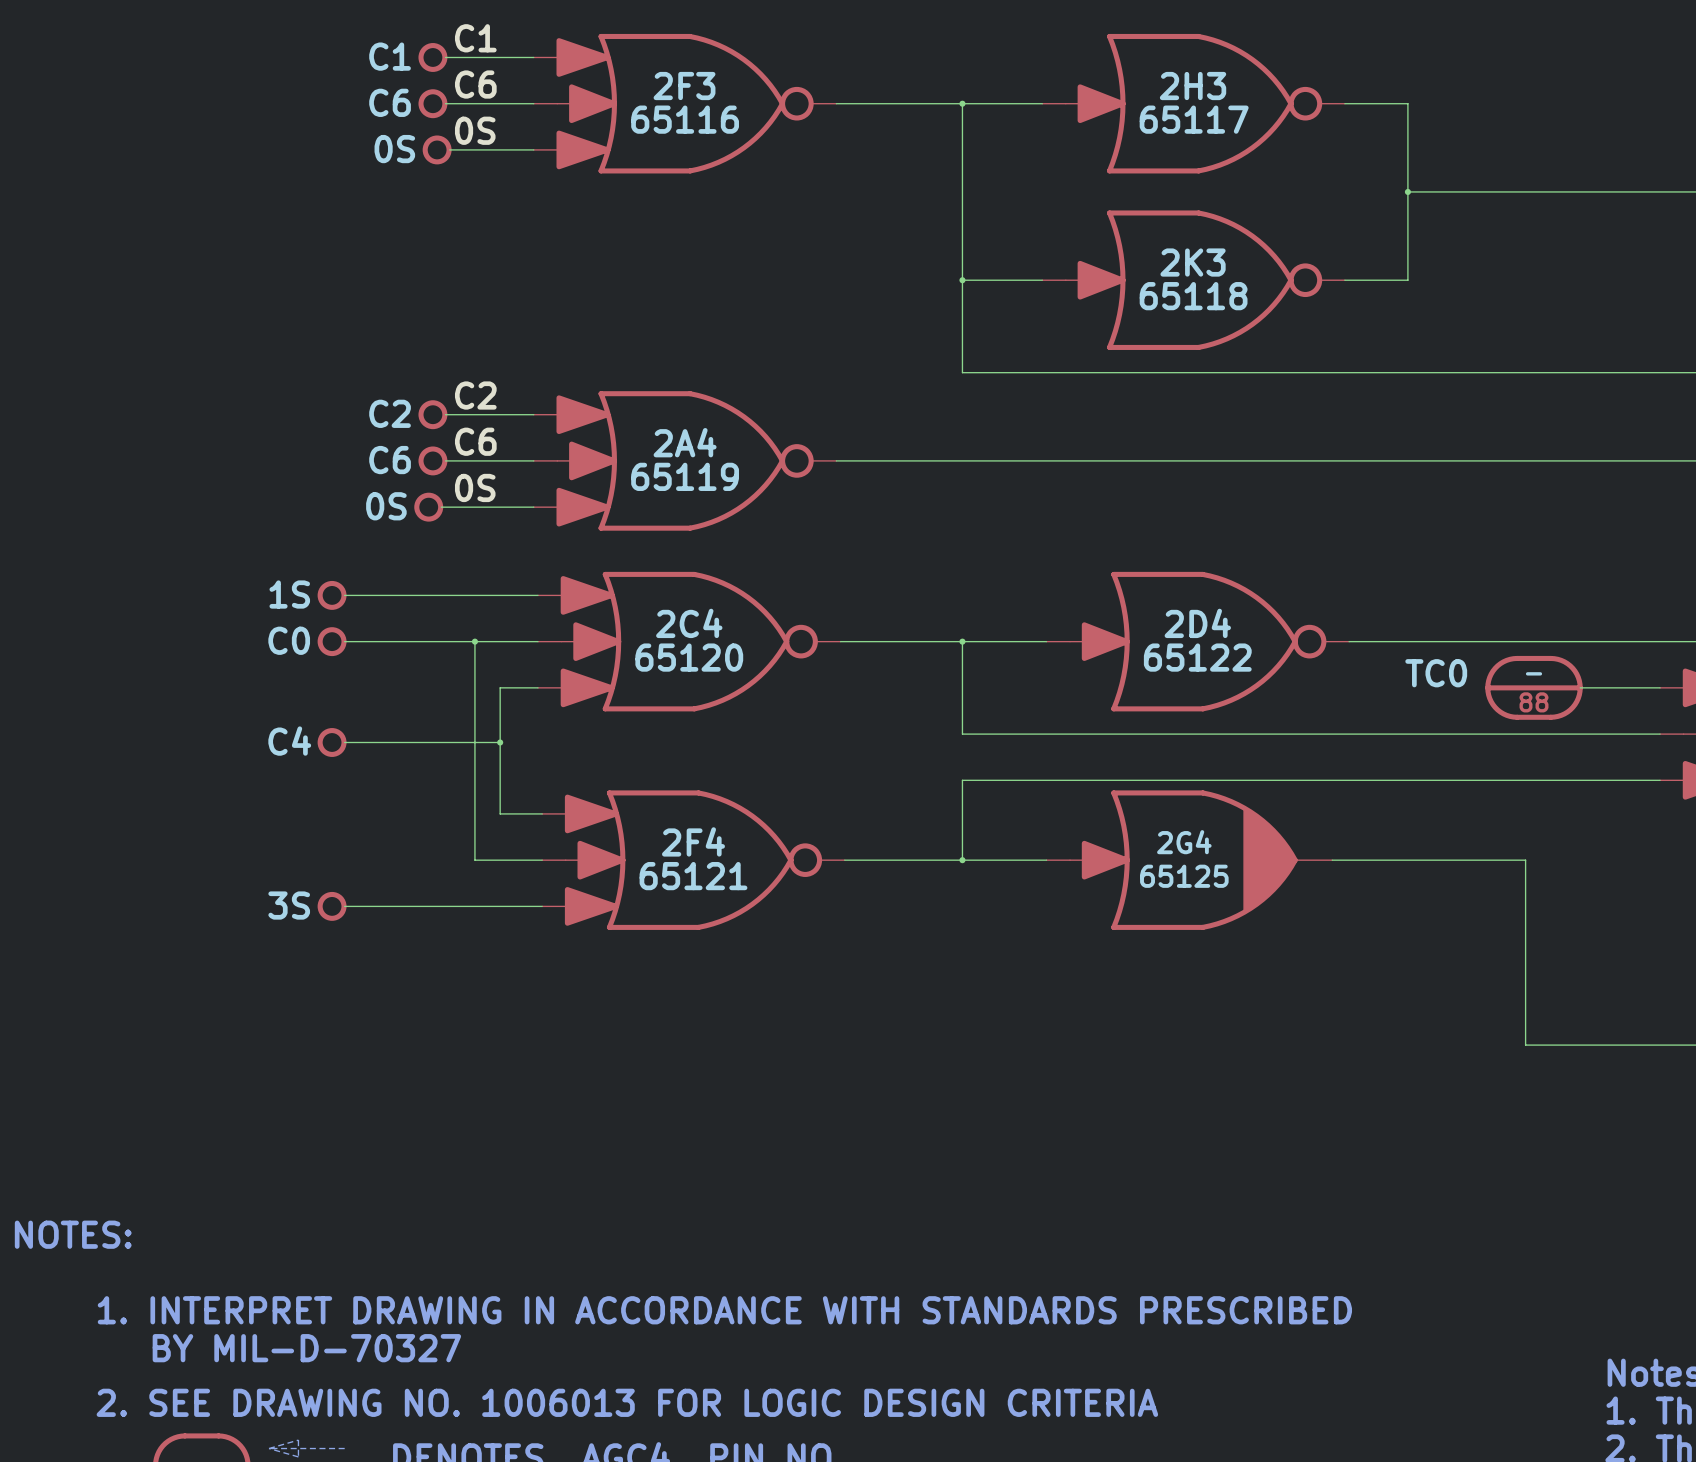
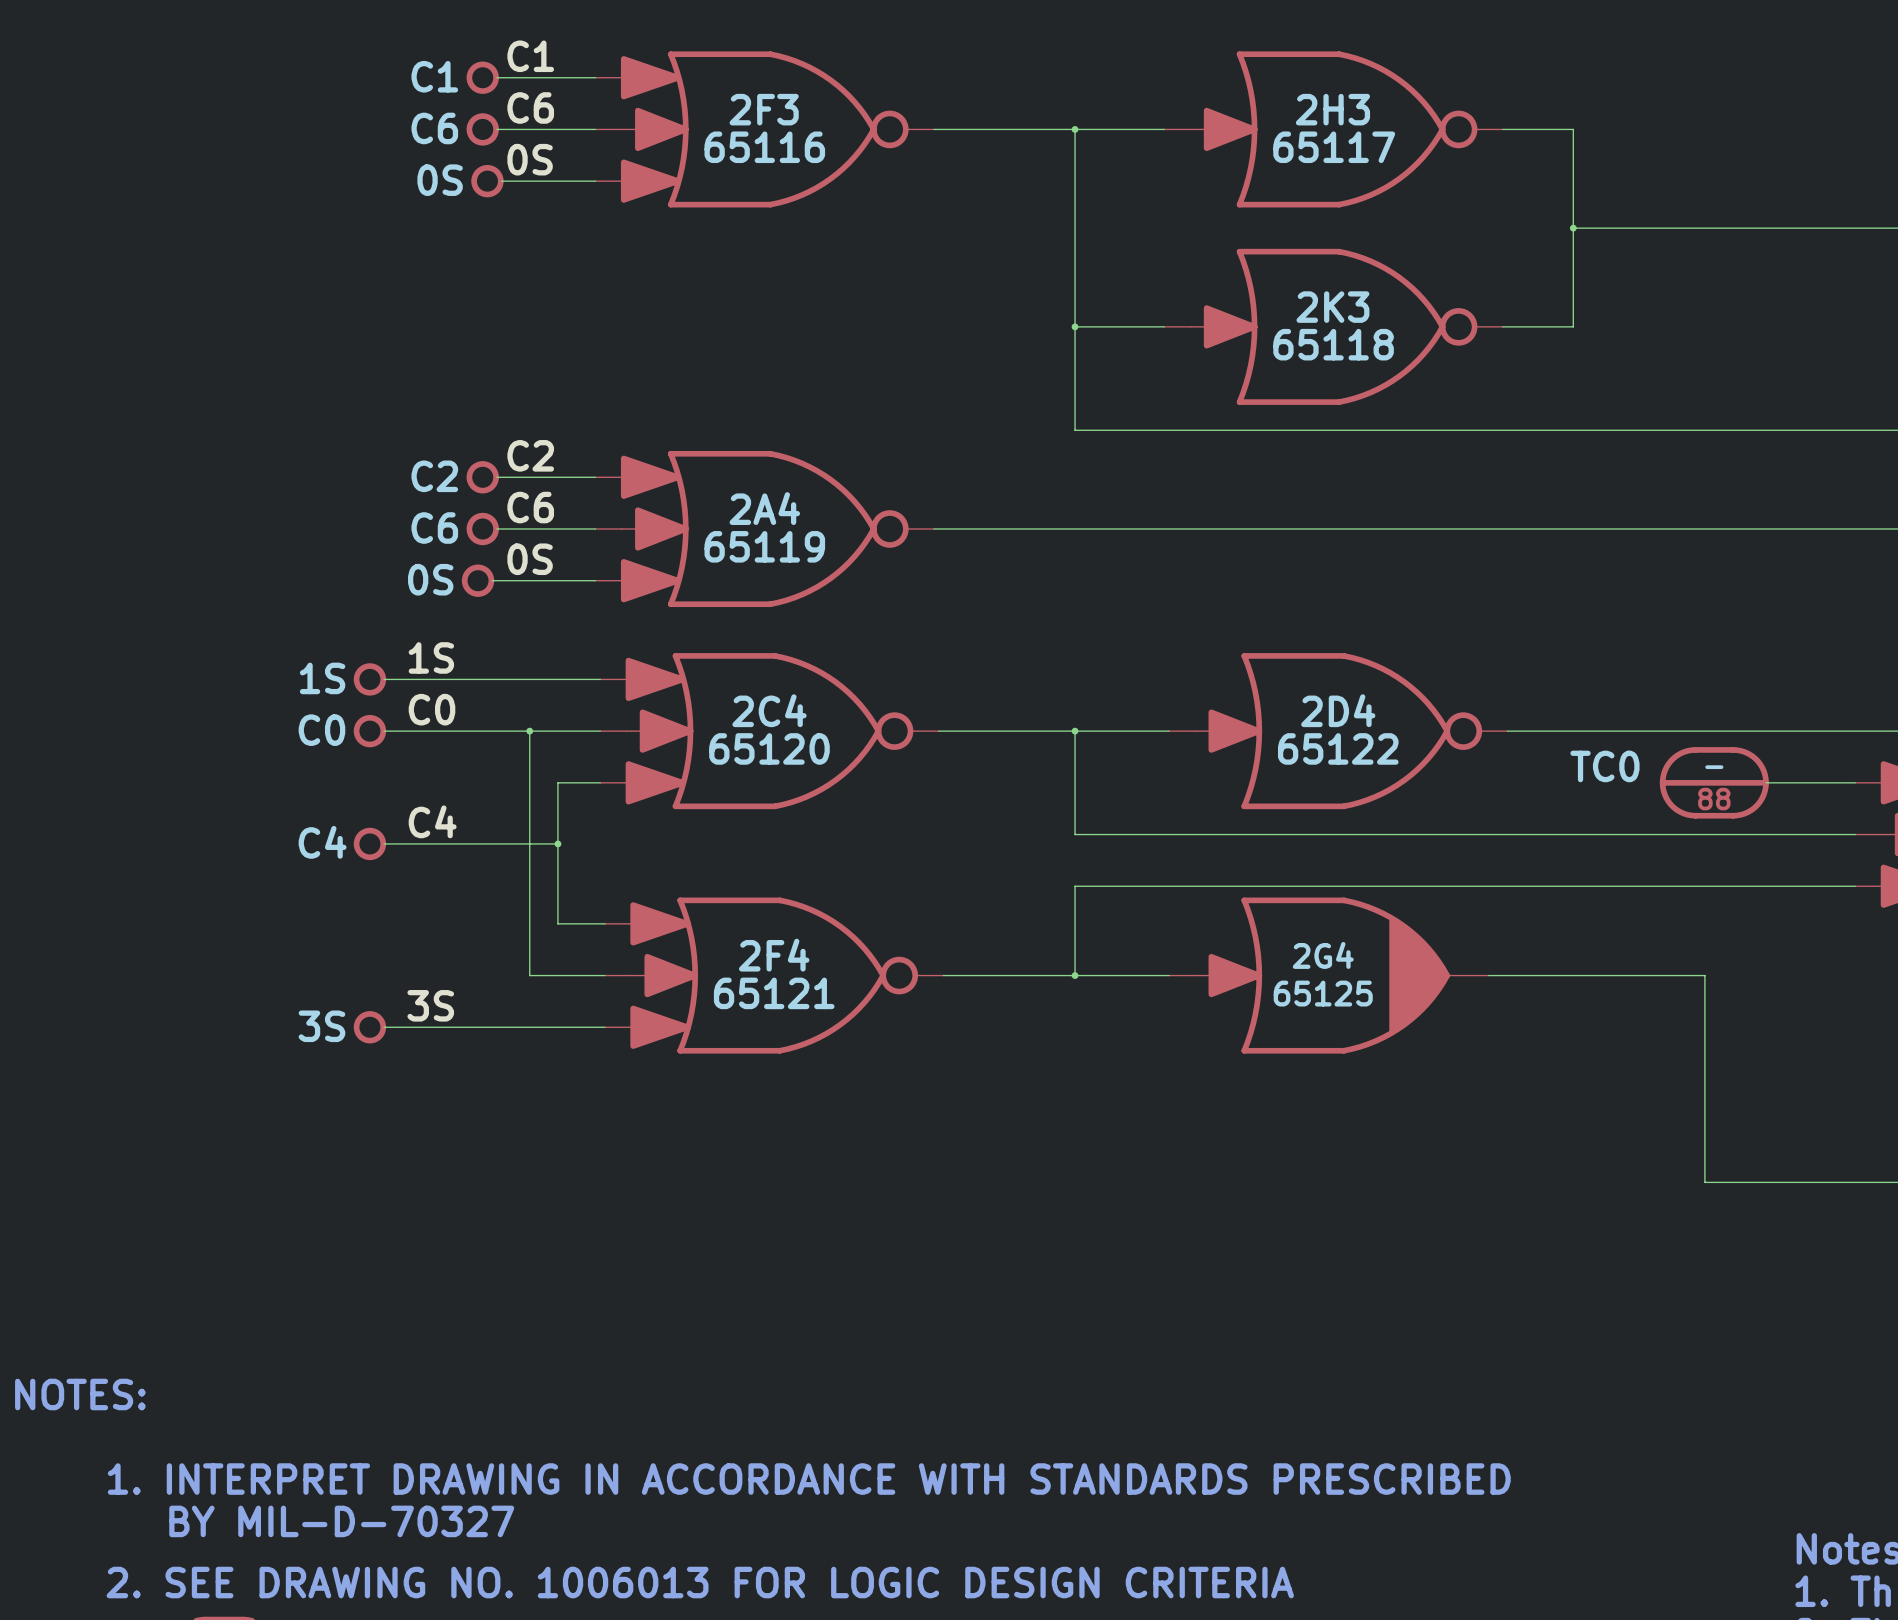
label: none -> 1S (431, 657)
label: none -> C0 (431, 709)
label: none -> C4 (432, 821)
label: none -> 3S (430, 1005)

